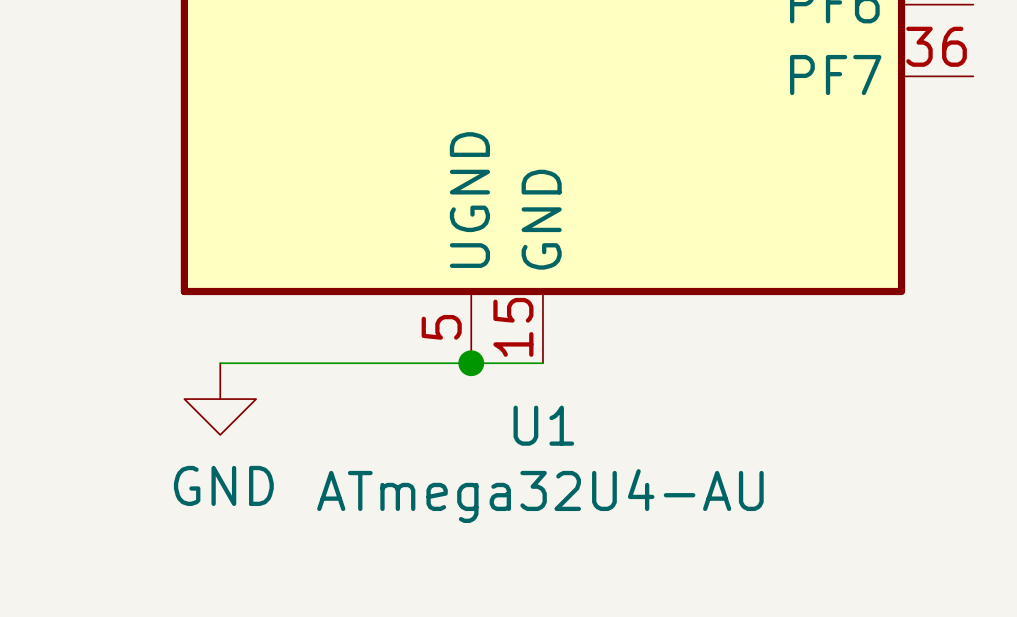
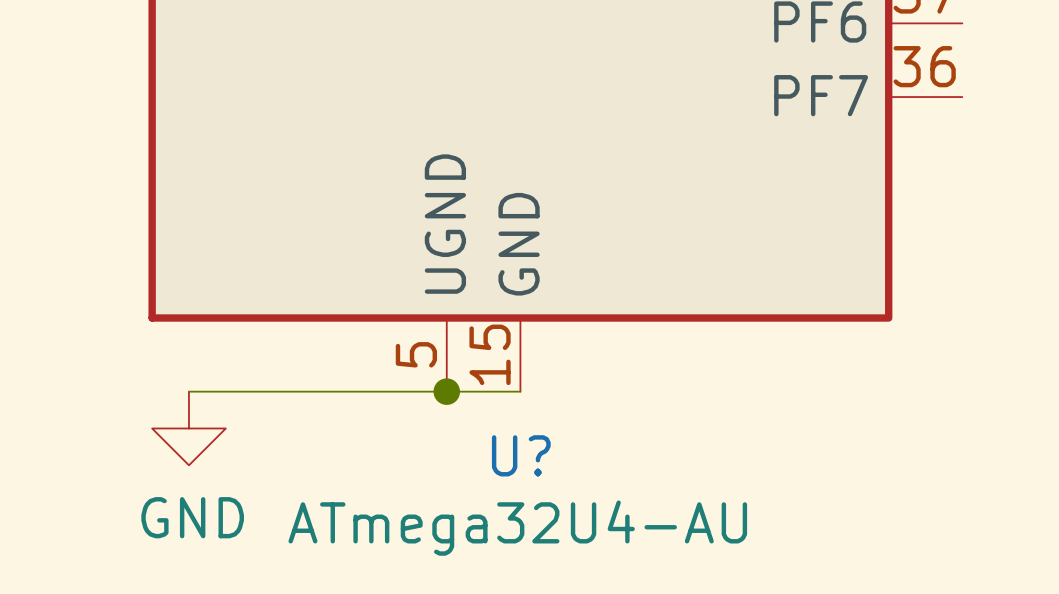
U1 name: U1 (543, 425) -> U? (521, 455)

